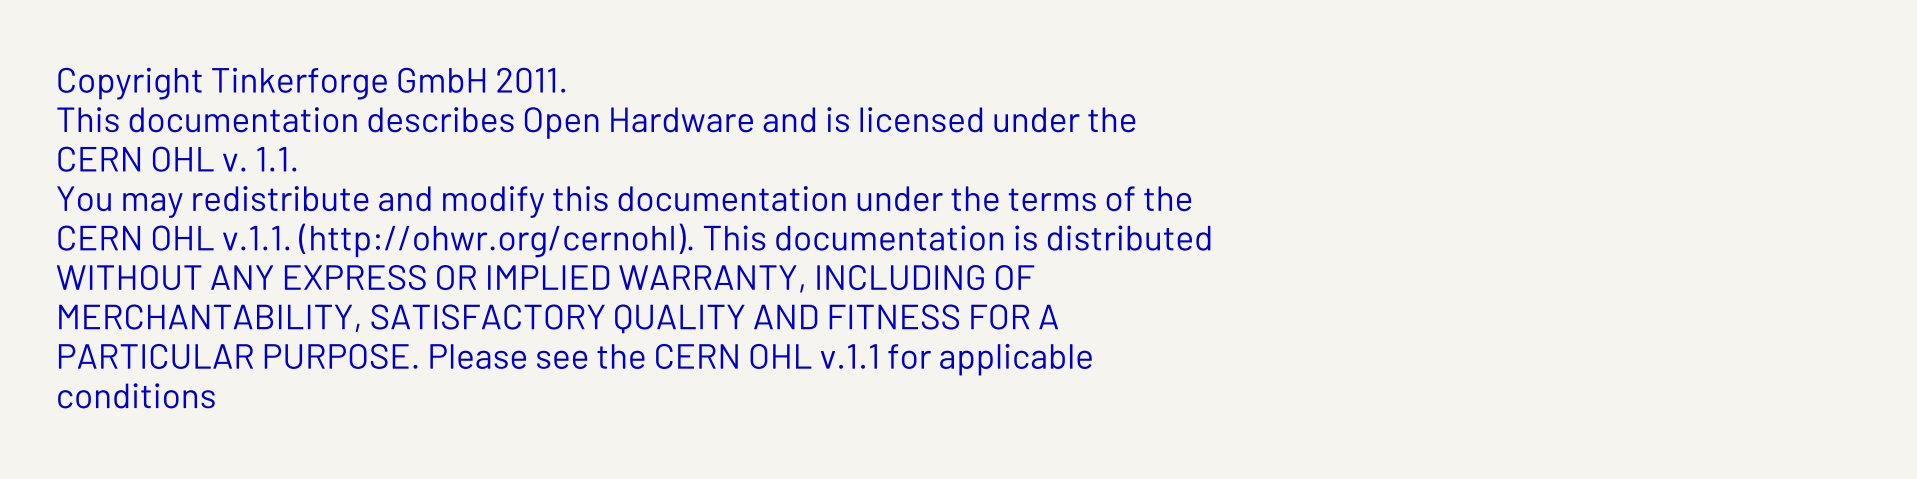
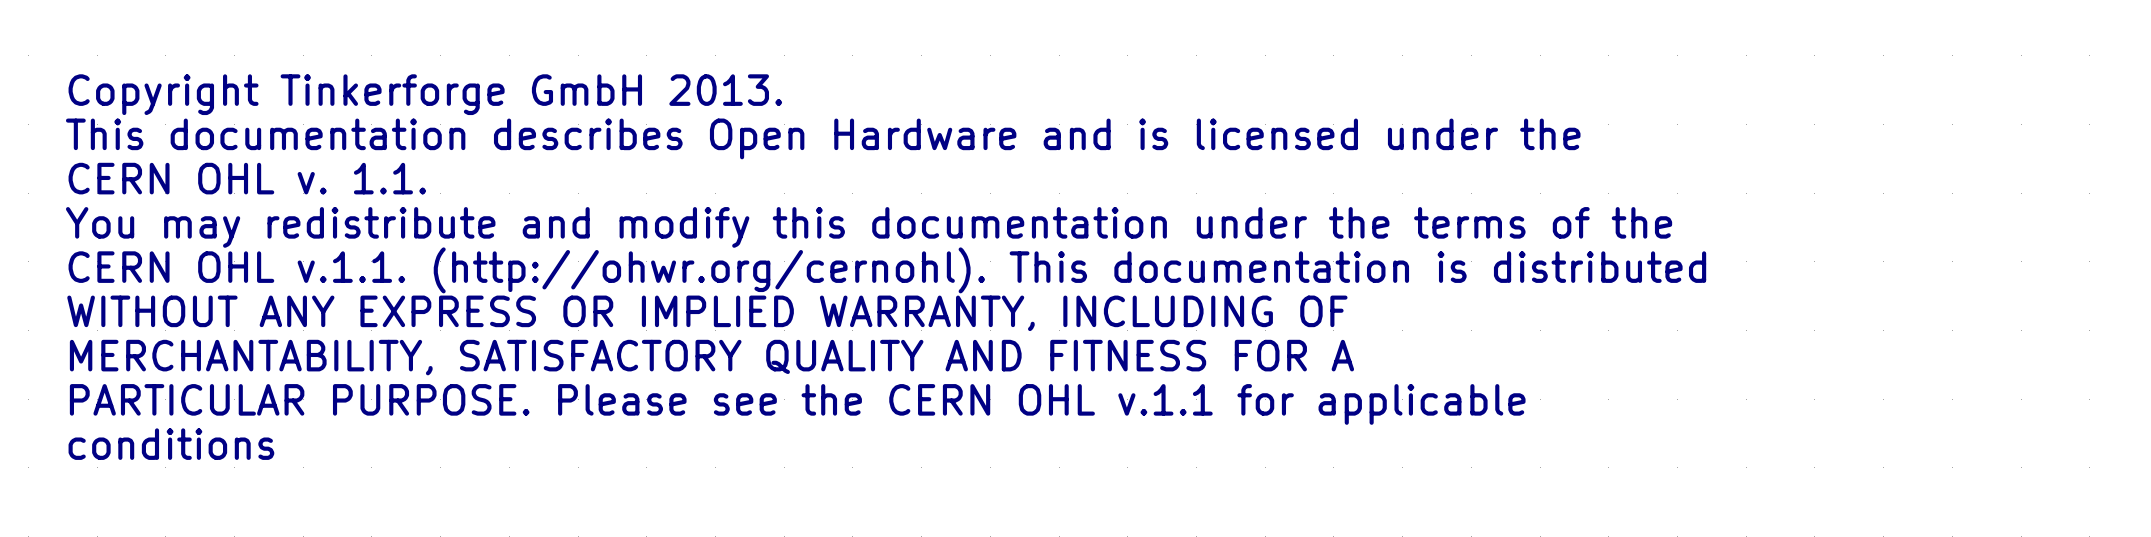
text: Copyright Tinkerforge GmbH 2011. (311, 83) -> Copyright Tinkerforge GmbH 2013. (425, 94)

